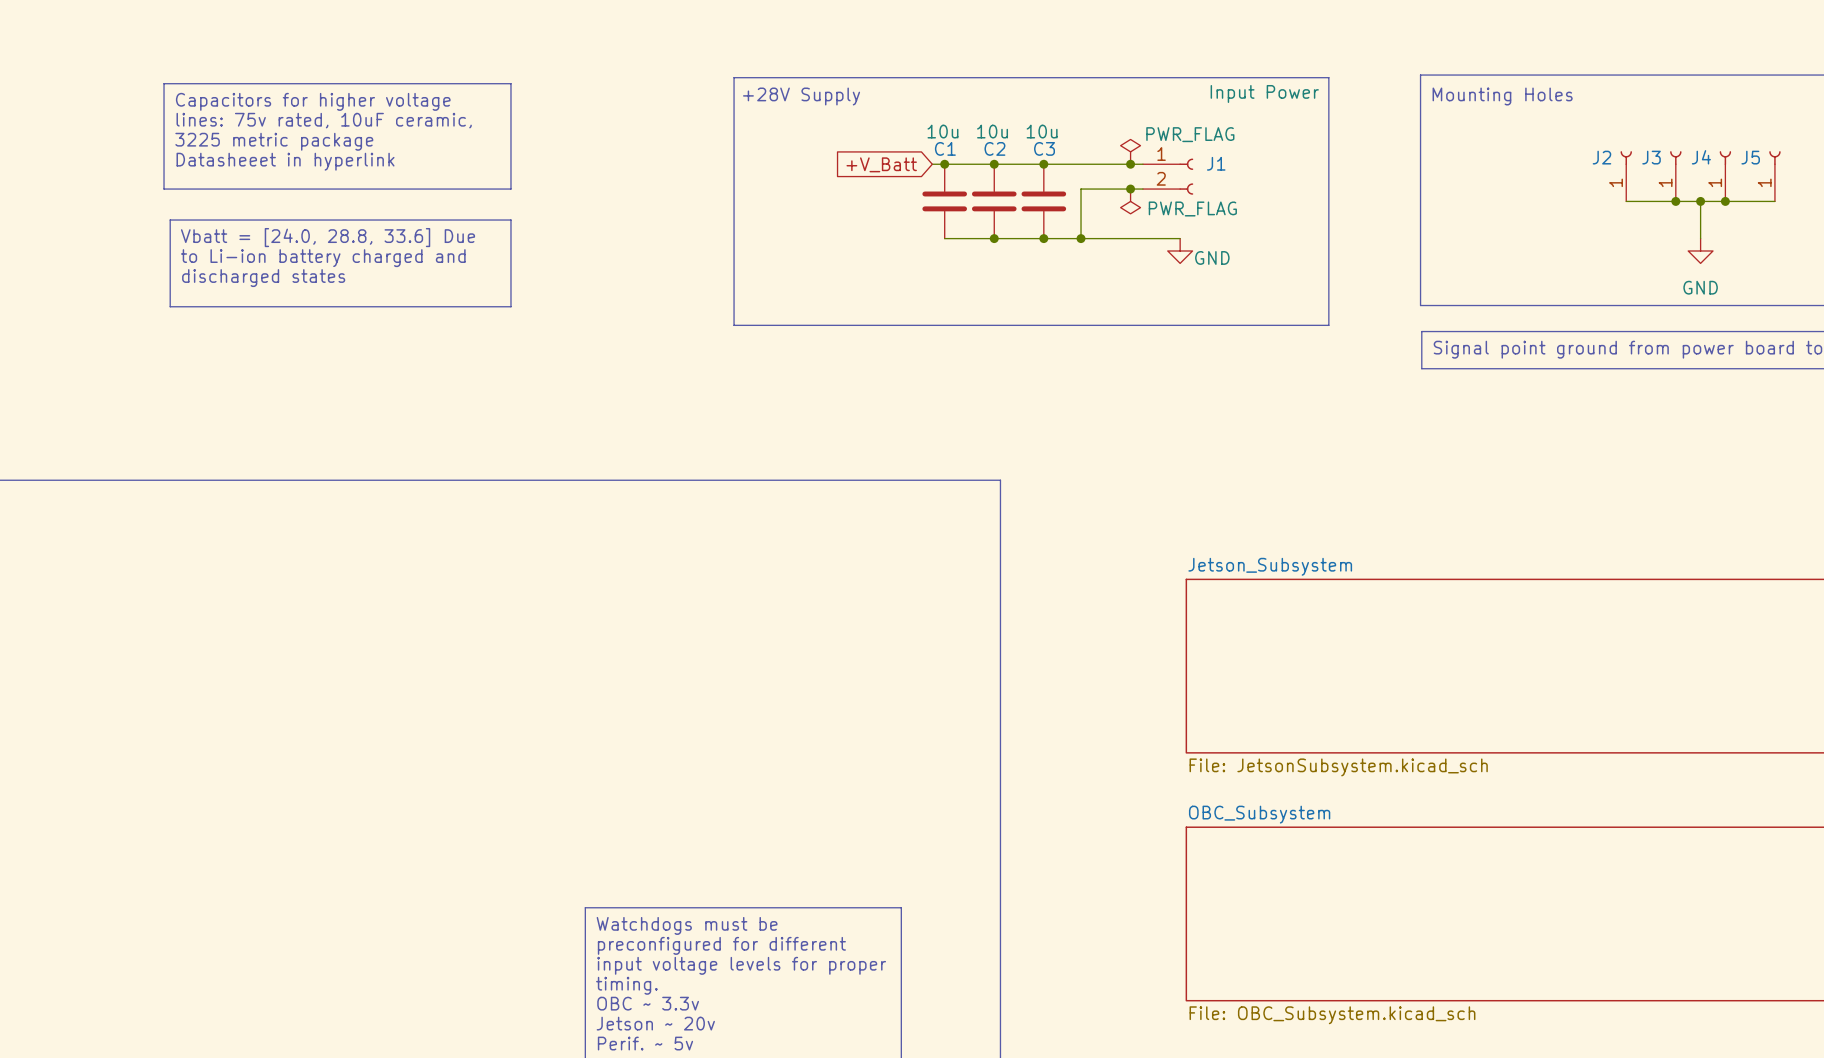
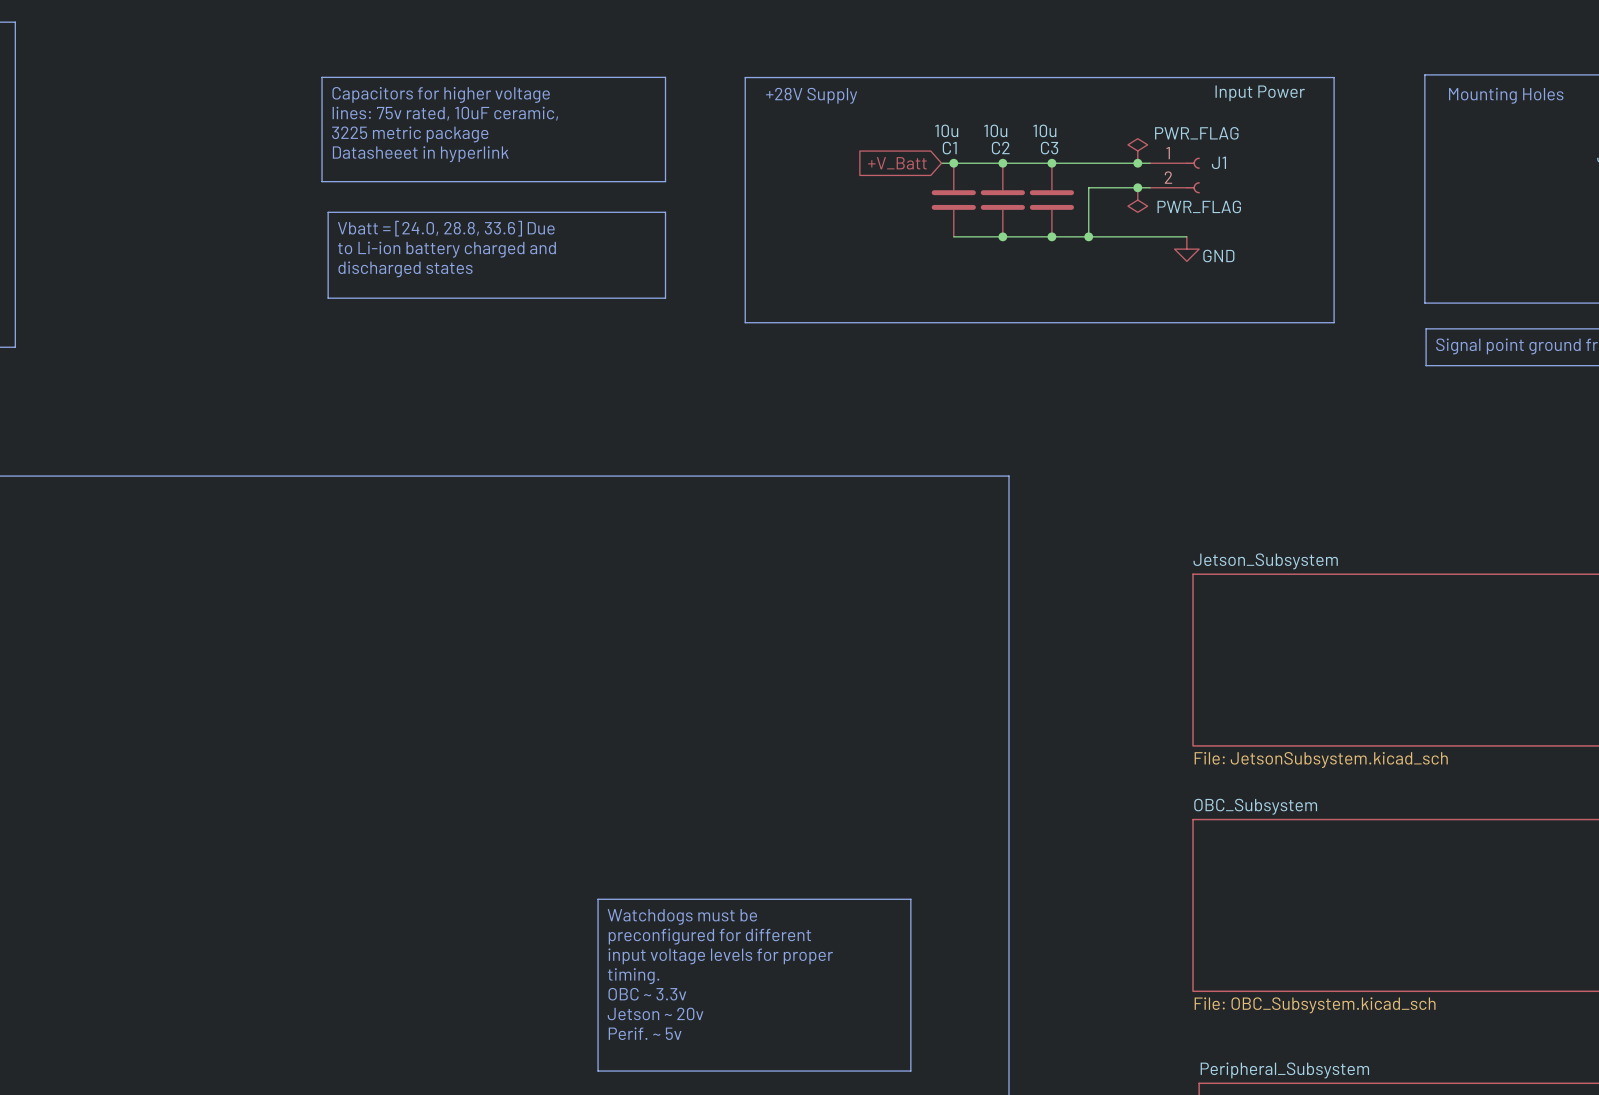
line: (164, 83) (510, 83) (510, 189) (164, 189) (164, 83) -> (322, 77) (665, 77) (665, 181) (322, 181) (322, 77)
text position: Capacitors for higher voltage (313, 101) -> Capacitors for higher voltage (441, 94)
text position: lines: 75v rated, 10uF ceramic, (324, 120) -> lines: 75v rated, 10uF ceramic, (445, 113)
text position: 3225 metric package (274, 141) -> 3225 metric package (410, 134)
text position: Datasheeet in hyperlink (285, 161) -> Datasheeet in hyperlink (420, 154)
line: (170, 220) (510, 220) (510, 306) (170, 306) (170, 220) -> (328, 212) (665, 212) (665, 298) (328, 298) (328, 212)
text position: Vbatt = [24.0, 28.8, 33.6] Due (328, 237) -> Vbatt = [24.0, 28.8, 33.6] Due (446, 228)
text position: to Li-ion battery charged and (323, 258) -> to Li-ion battery charged and (446, 249)
text position: discharged states (263, 278) -> discharged states (405, 269)

